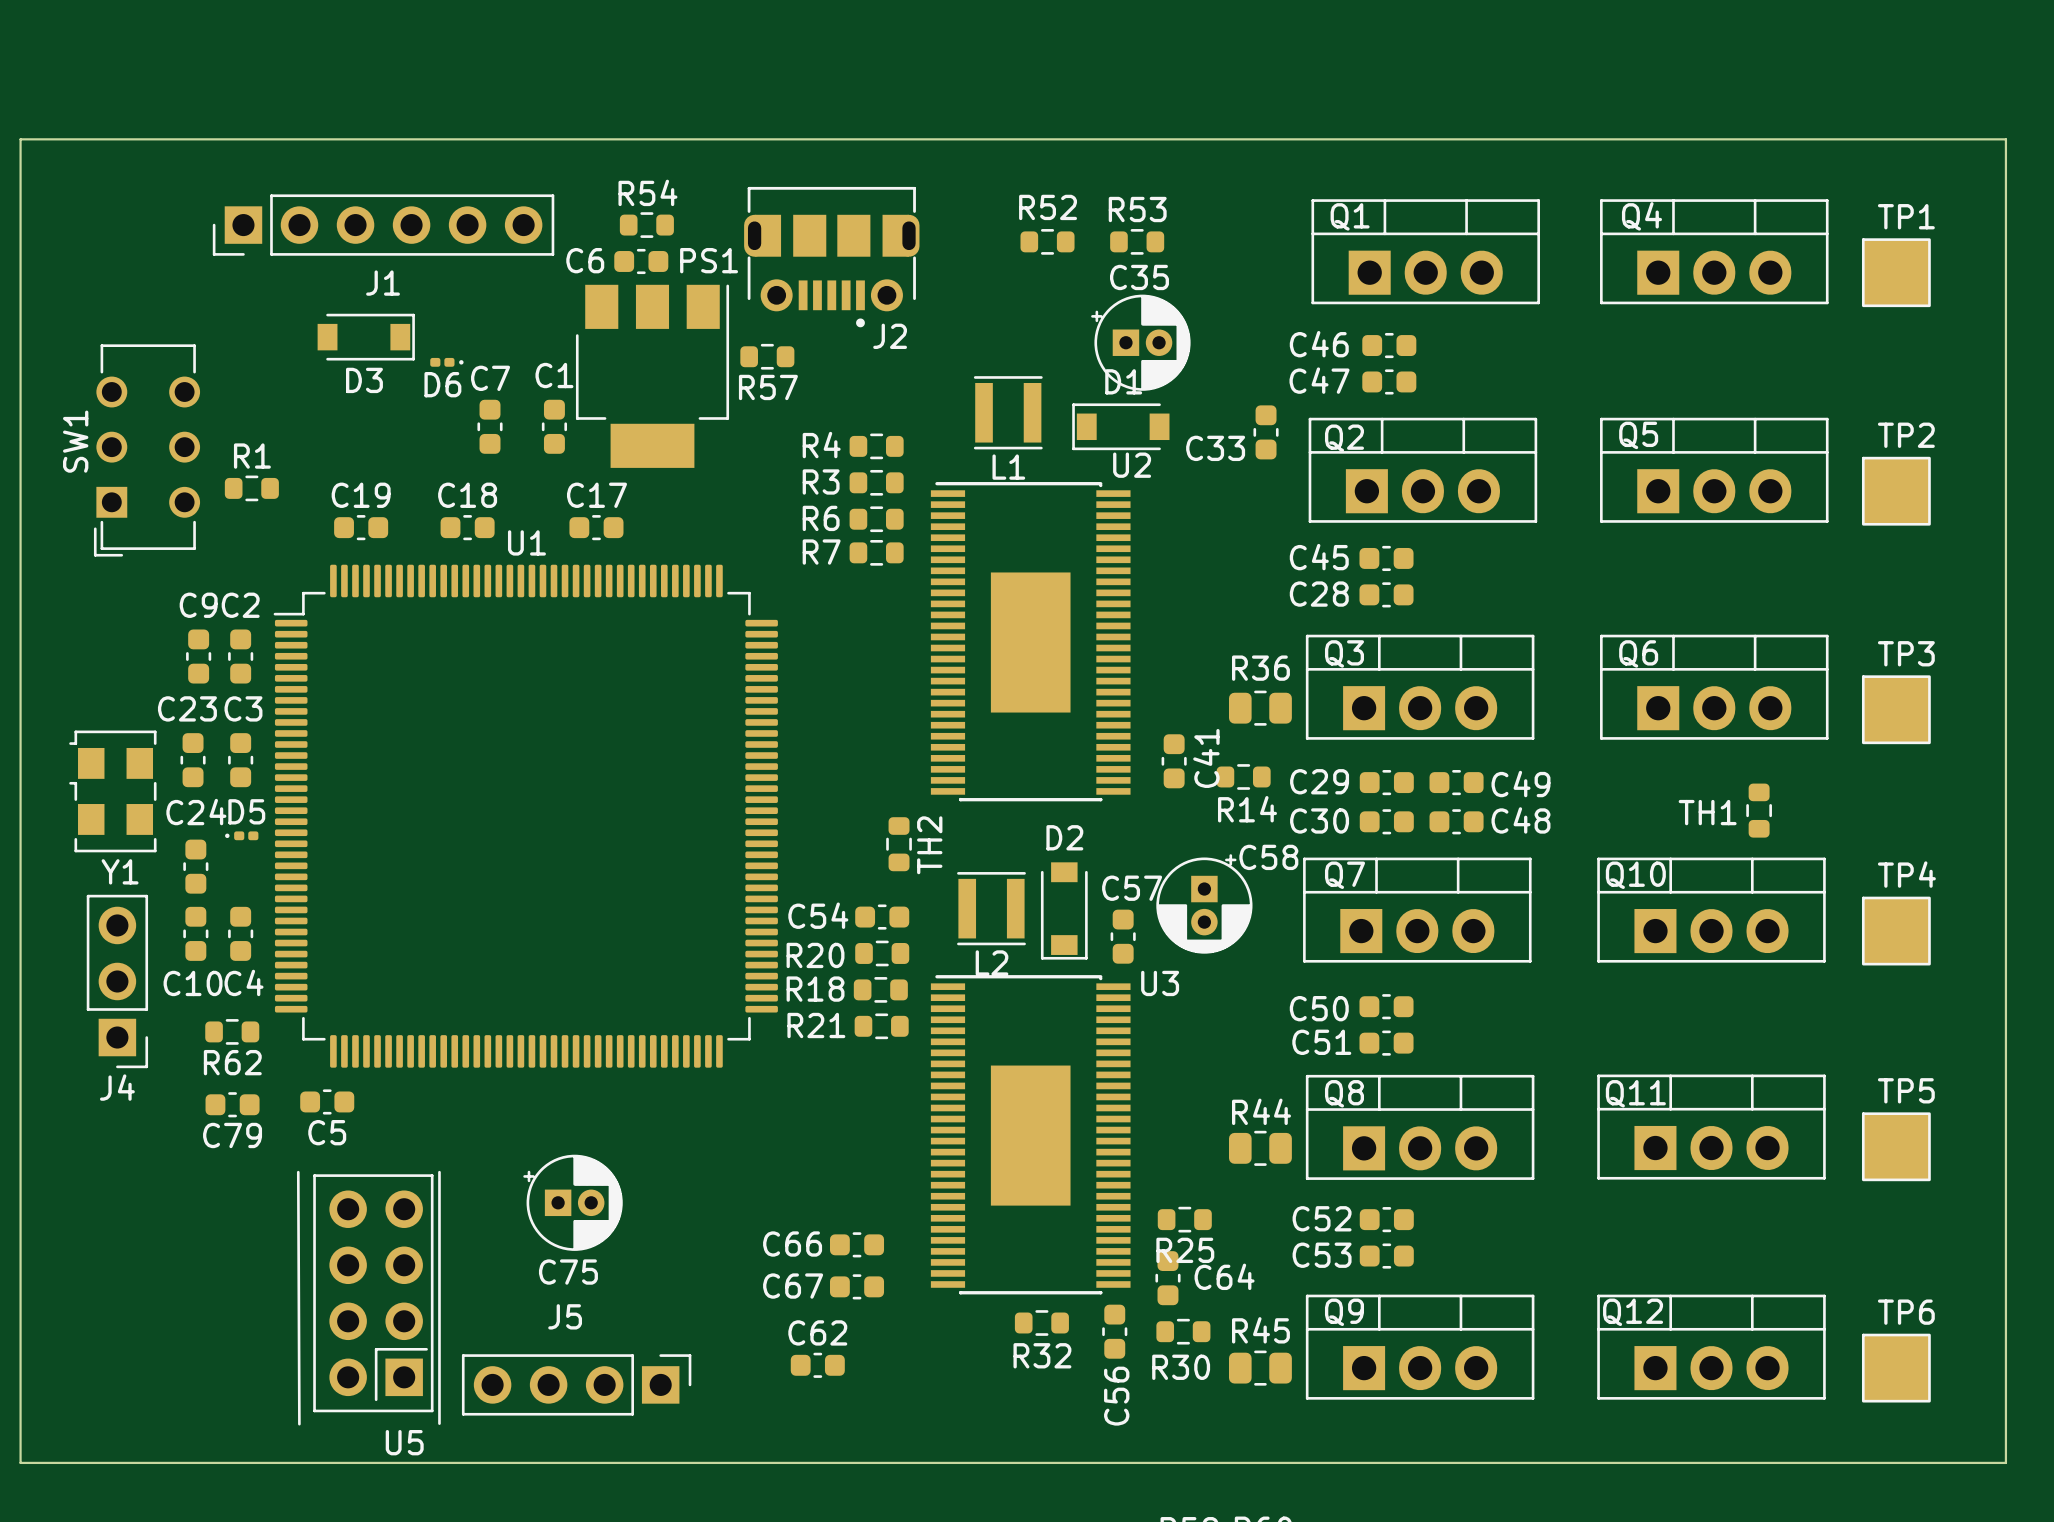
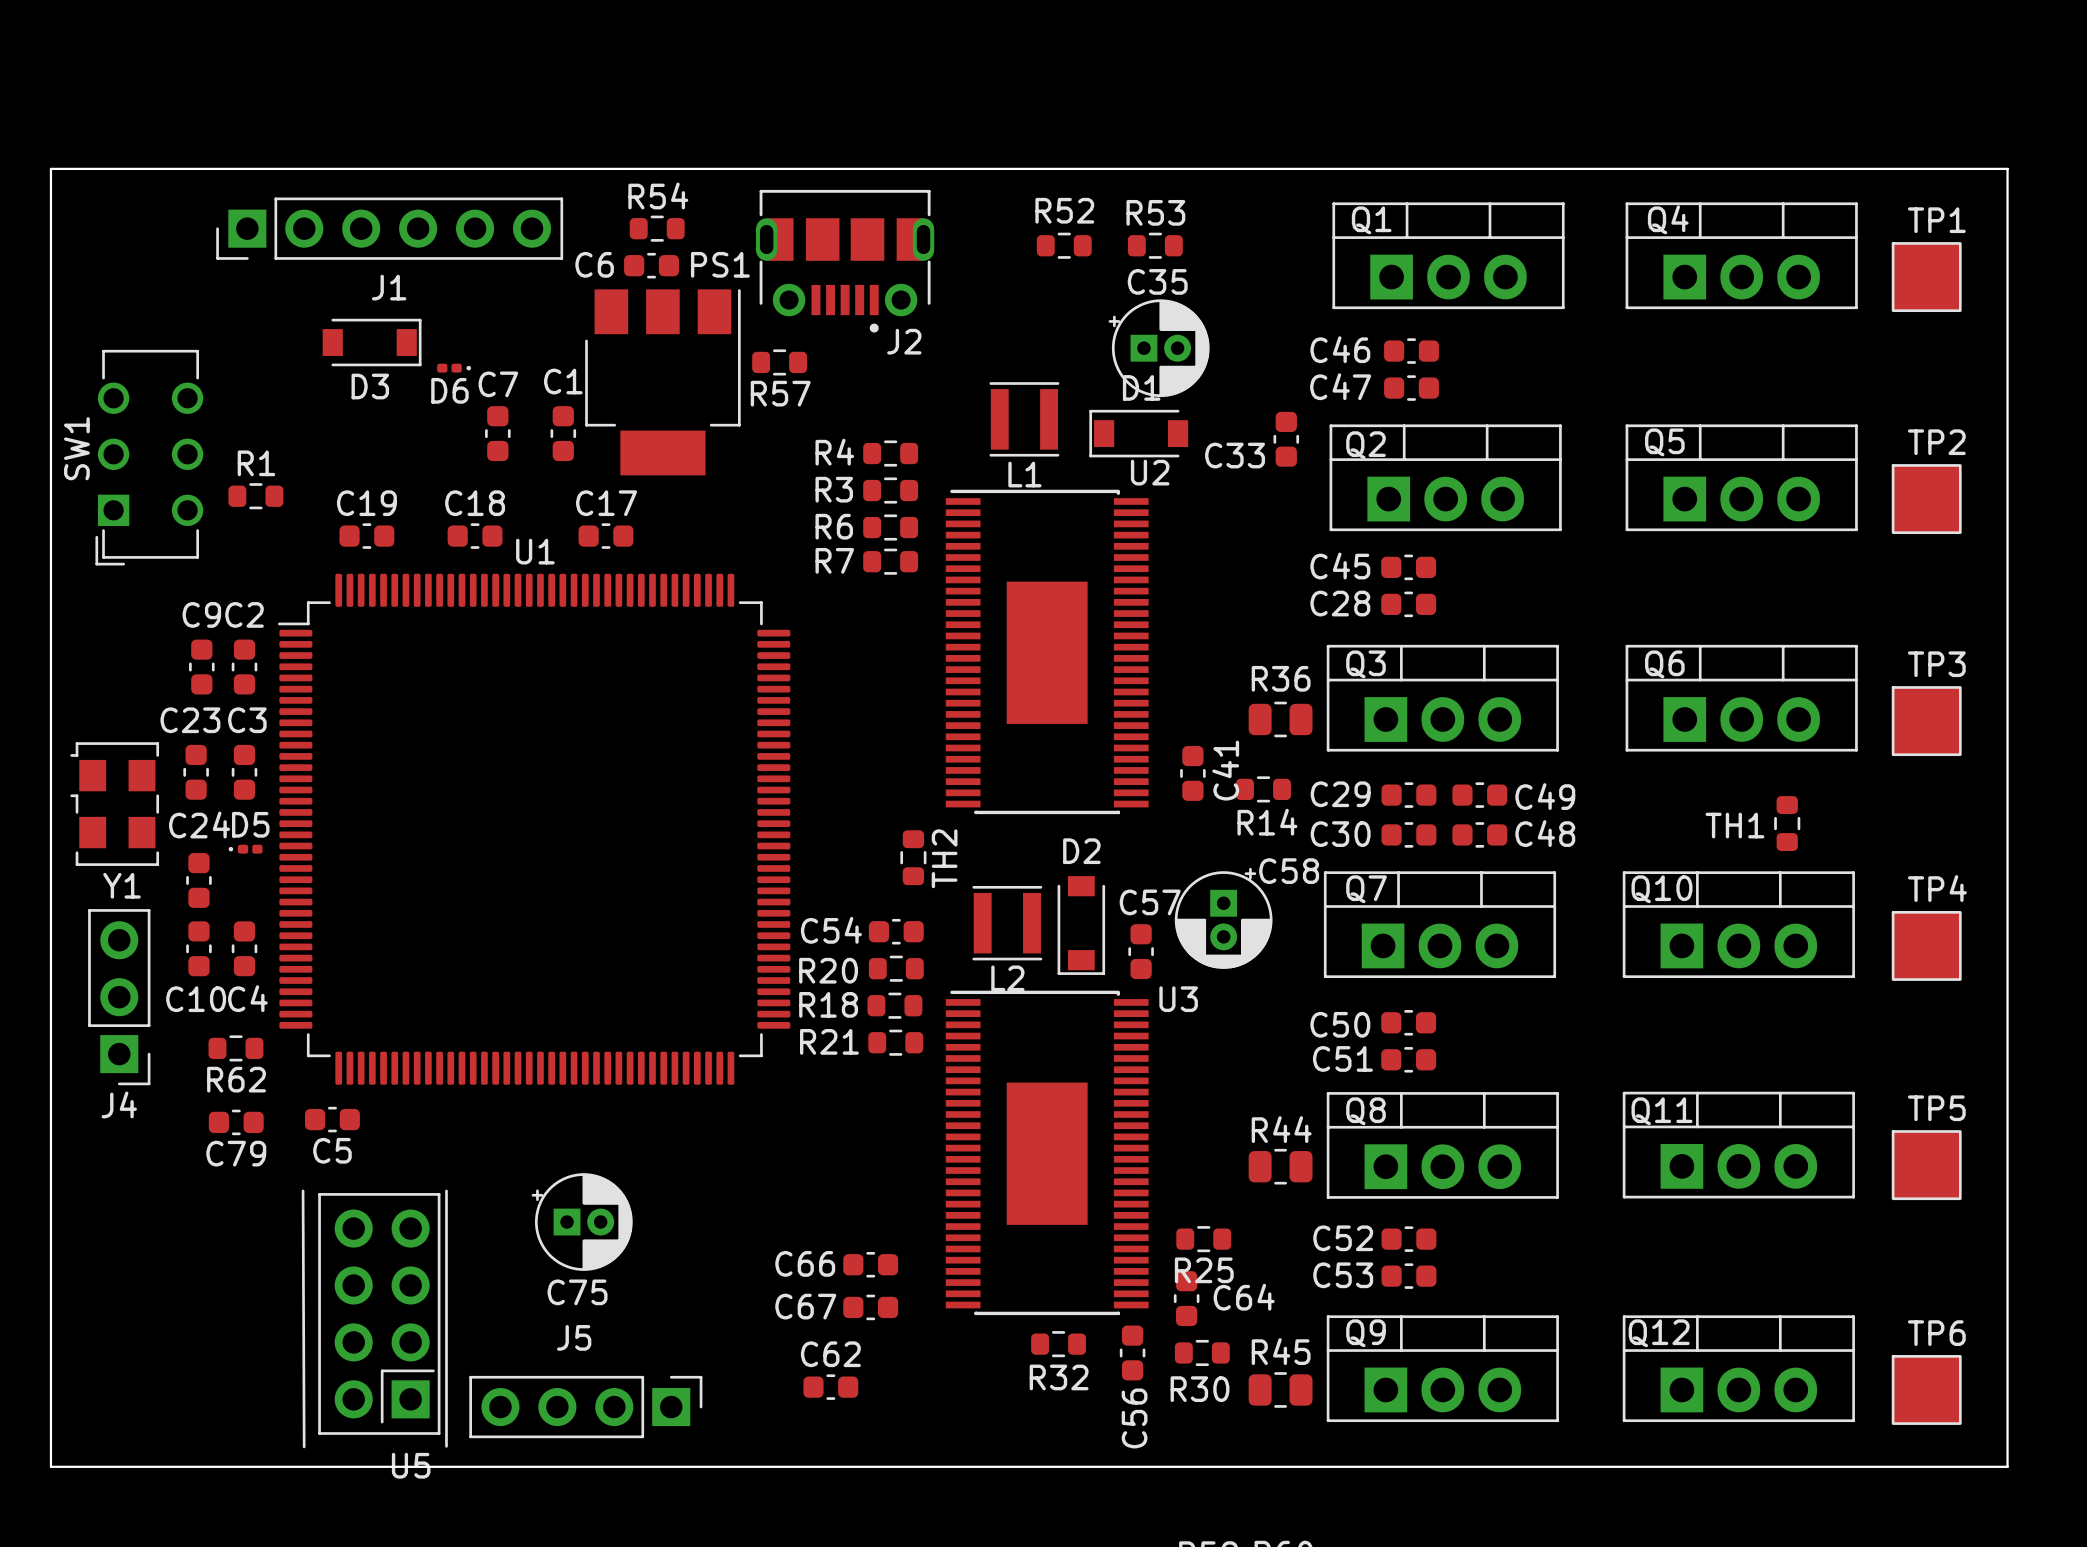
board edge: (20, 139) (2005, 139) (2005, 1462) (20, 1462) (20, 139) -> (50, 168) (50, 1466) (2007, 1466) (2007, 168) (50, 168)

